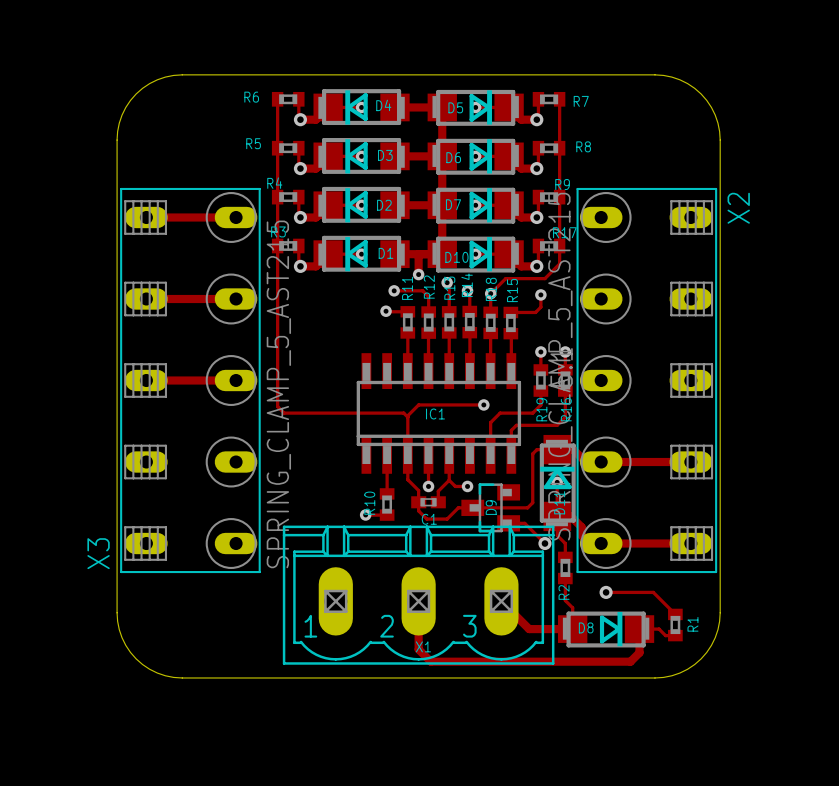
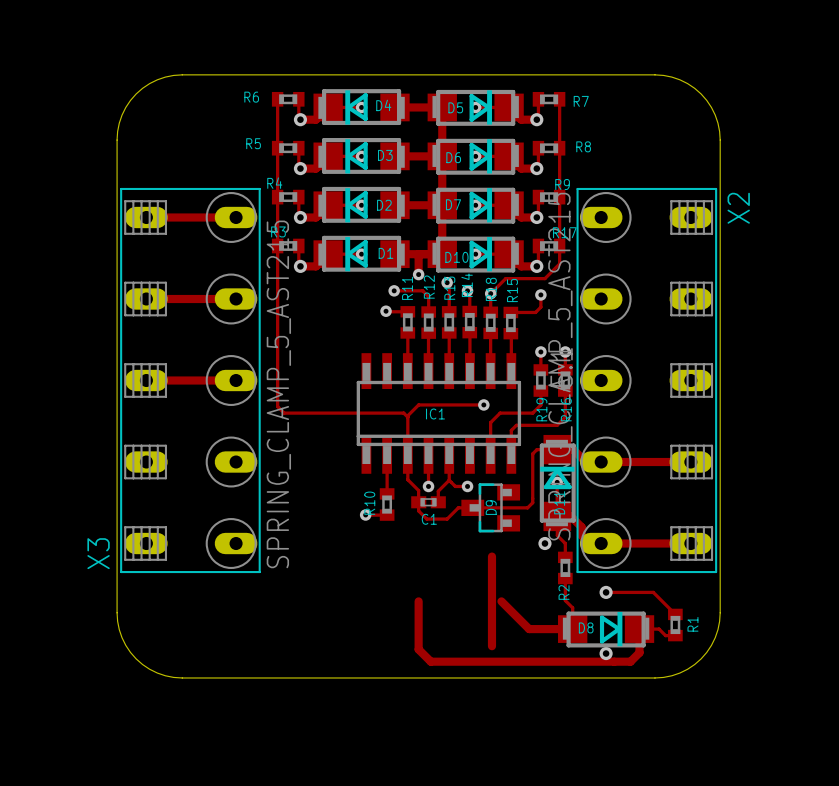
track: (508, 523) (524, 523) (544, 543) -> none
track: none -> (491, 556) (491, 646)
X1: (418, 595) -> none
via: none -> (606, 653)

